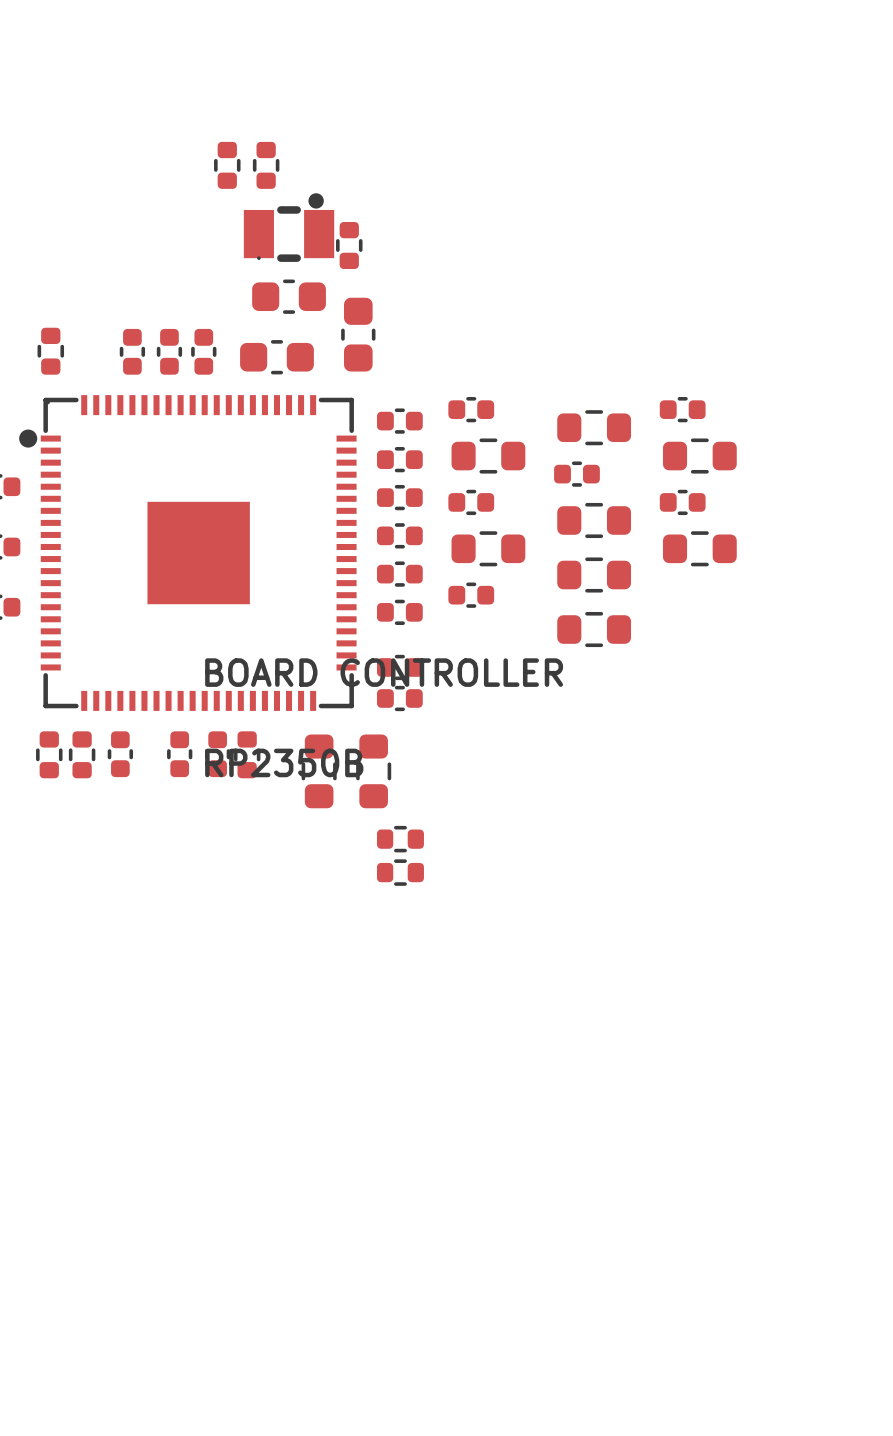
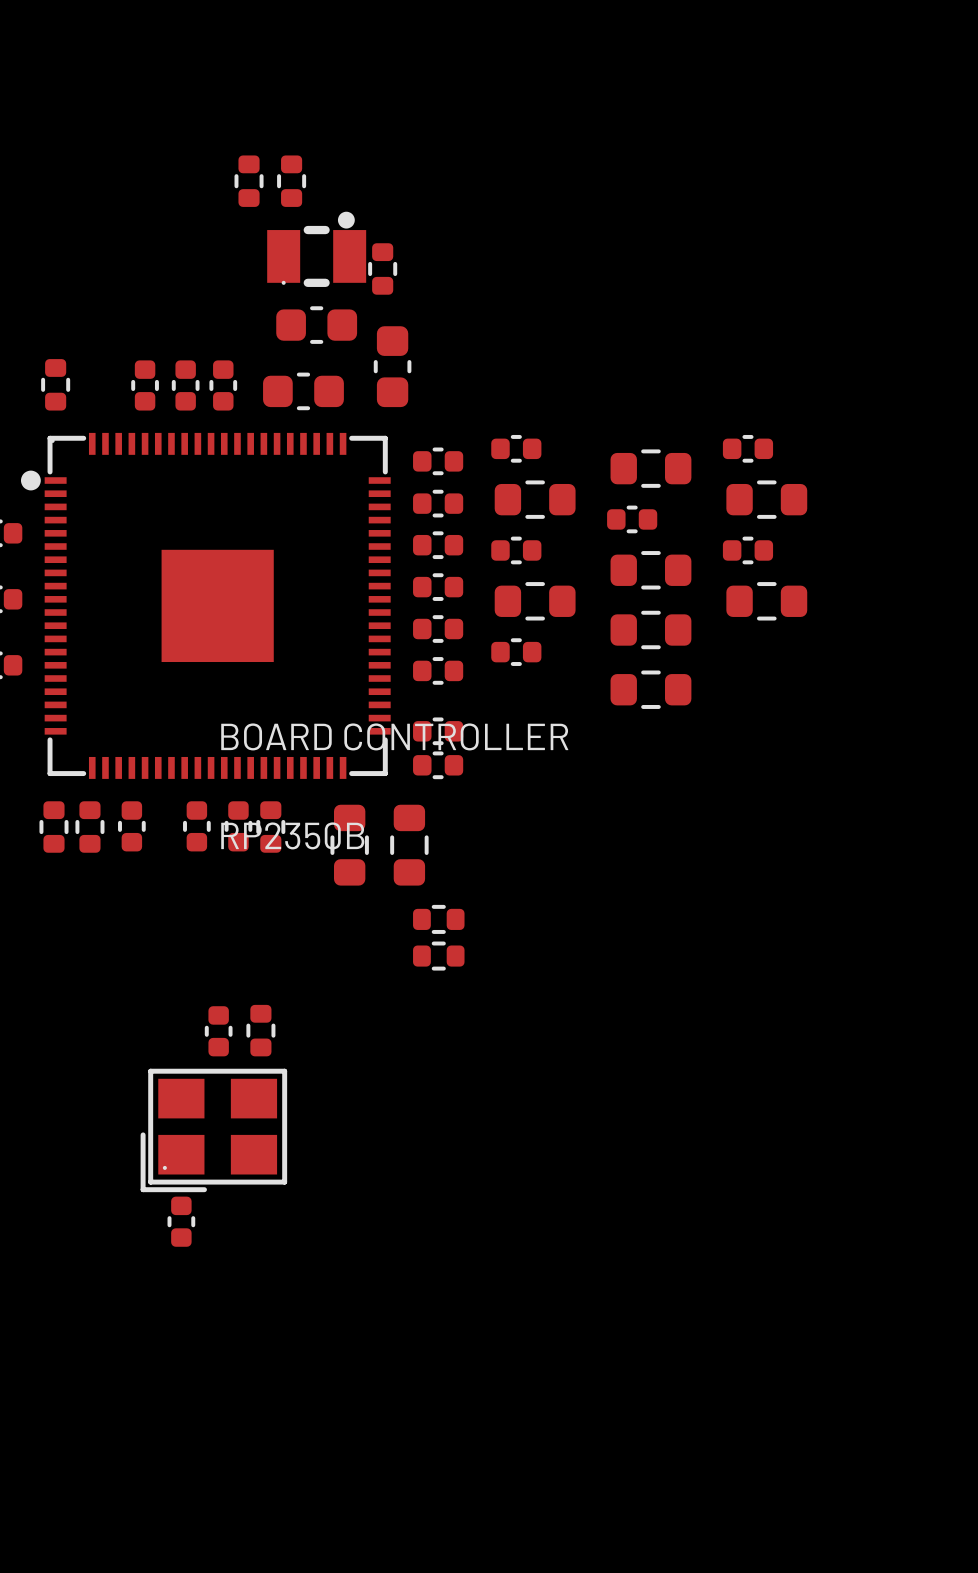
part: none -> (260, 1030)
part: none -> (218, 1031)
part: none -> (213, 1130)
part: none -> (181, 1221)

